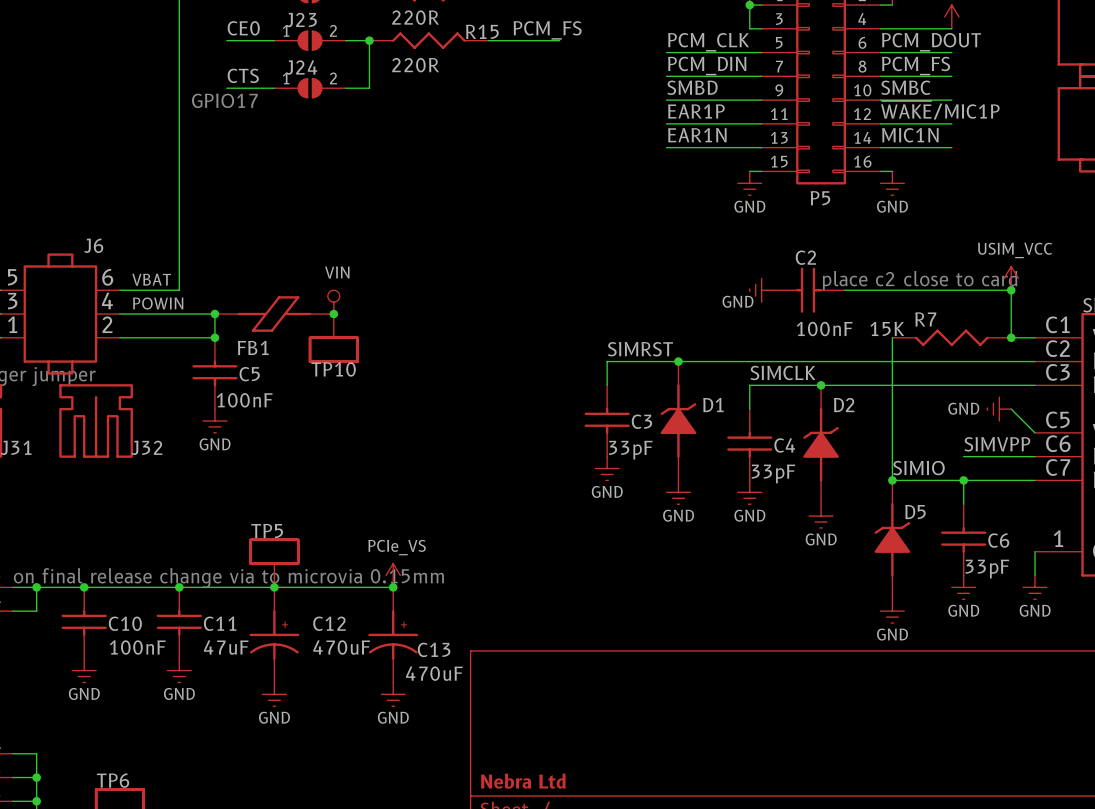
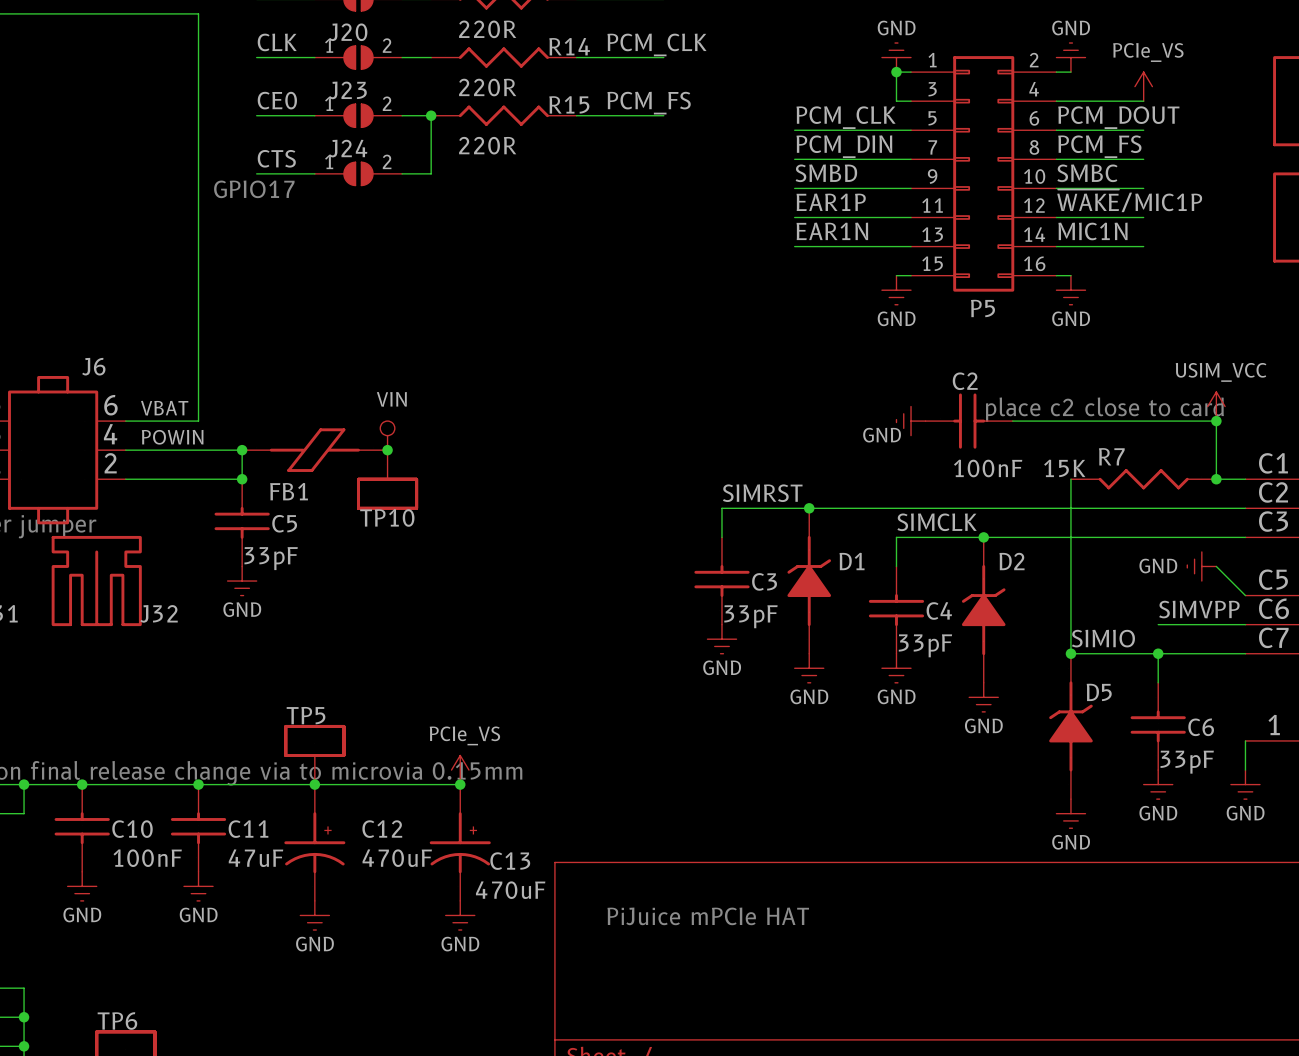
C5 value: 100nF (244, 400) -> 33pF (271, 558)
text: none -> PiJuice mPCIe HAT (708, 916)
title block: Nebra Ltd (523, 781) -> none

